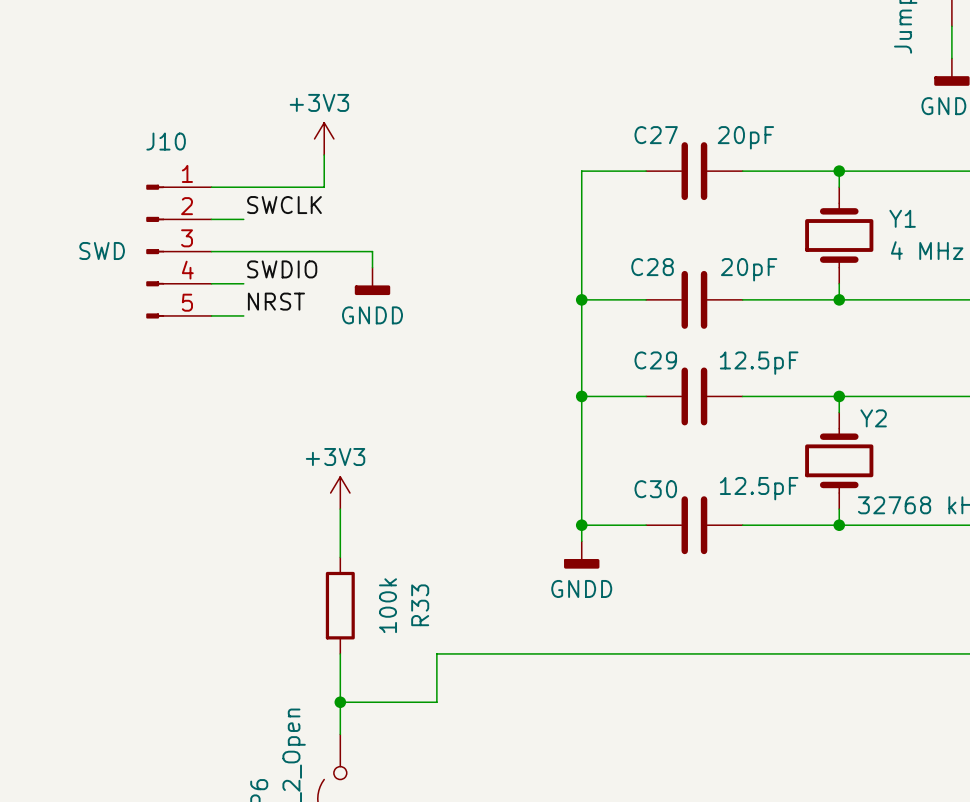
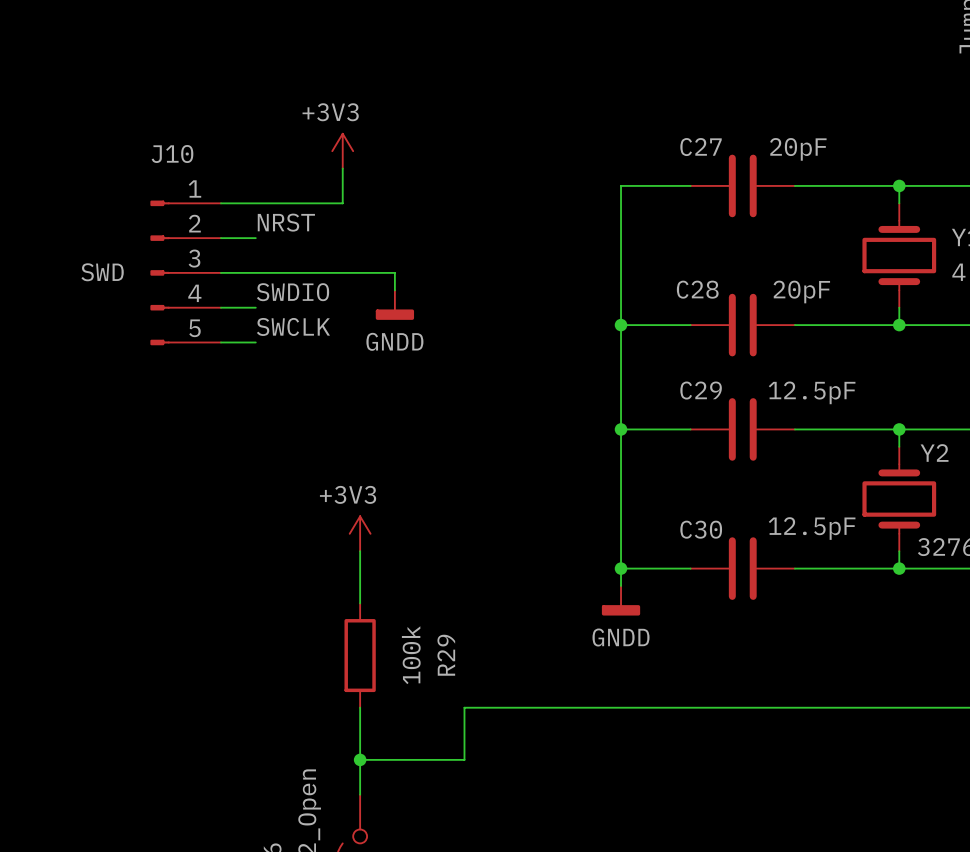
label: SWCLK (284, 205) -> NRST (286, 222)
label: NRST (276, 301) -> SWCLK (293, 326)
R33 name: R33 (420, 605) -> R29 (446, 655)

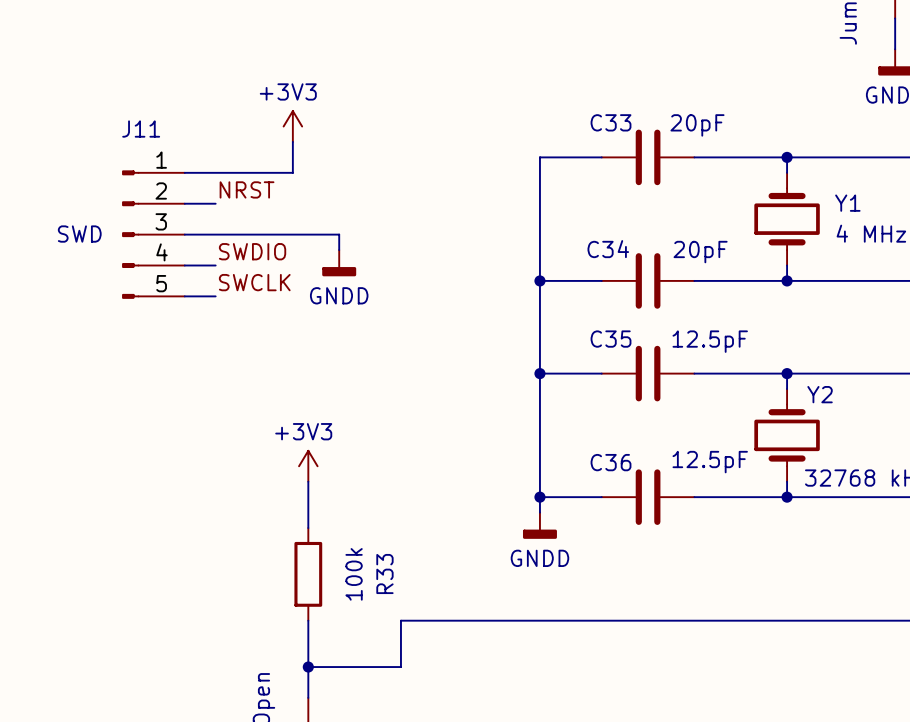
C27 name: C27 (701, 147) -> C33 (611, 122)
J10 name: J10 (172, 153) -> J11 (141, 129)
C28 name: C28 (697, 289) -> C34 (608, 249)
C29 name: C29 (701, 390) -> C35 (611, 339)
C30 name: C30 (701, 529) -> C36 (611, 462)
R29 name: R29 (446, 655) -> R33 (384, 574)

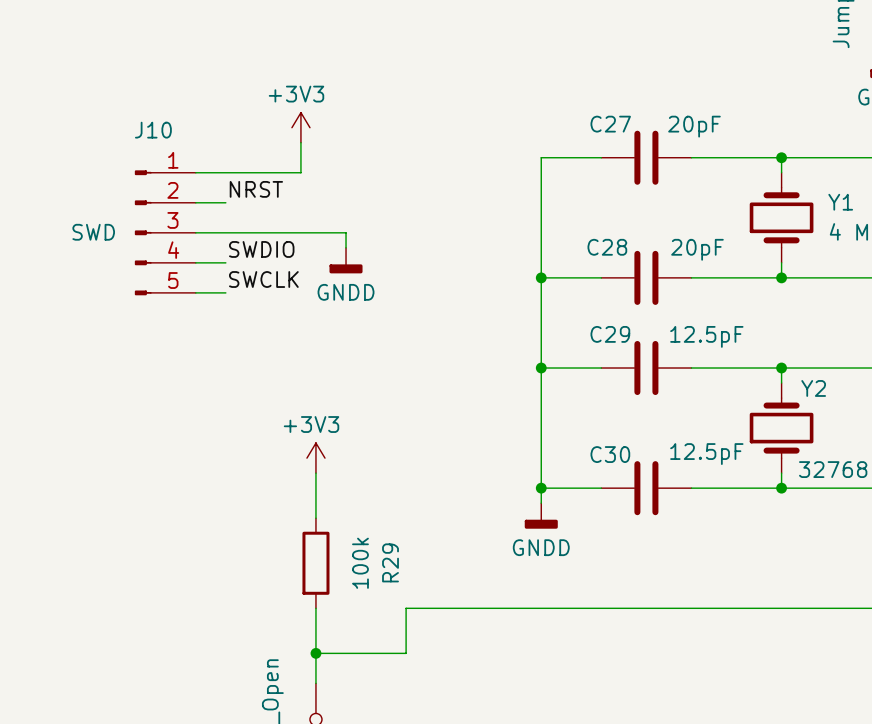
C33 name: C33 (611, 122) -> C27 (610, 124)
J11 name: J11 (141, 129) -> J10 (153, 130)
C34 name: C34 (608, 249) -> C28 (607, 247)
C35 name: C35 (611, 339) -> C29 (610, 334)
C36 name: C36 (611, 462) -> C30 (610, 454)
R33 name: R33 (384, 574) -> R29 (390, 562)

